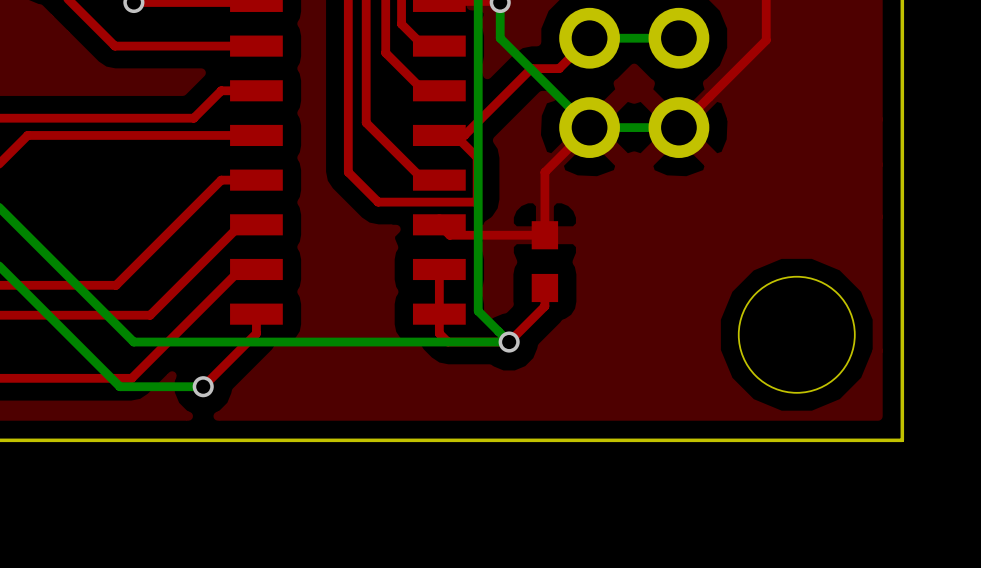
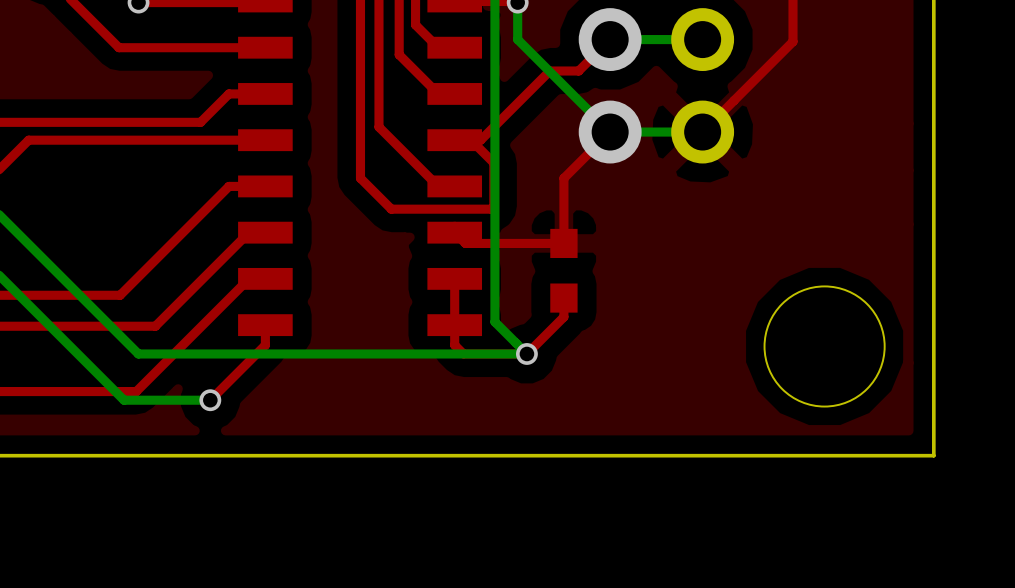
part: (589, 38) -> none
via: none -> (610, 39)
part: (589, 127) -> none
via: none -> (610, 132)

